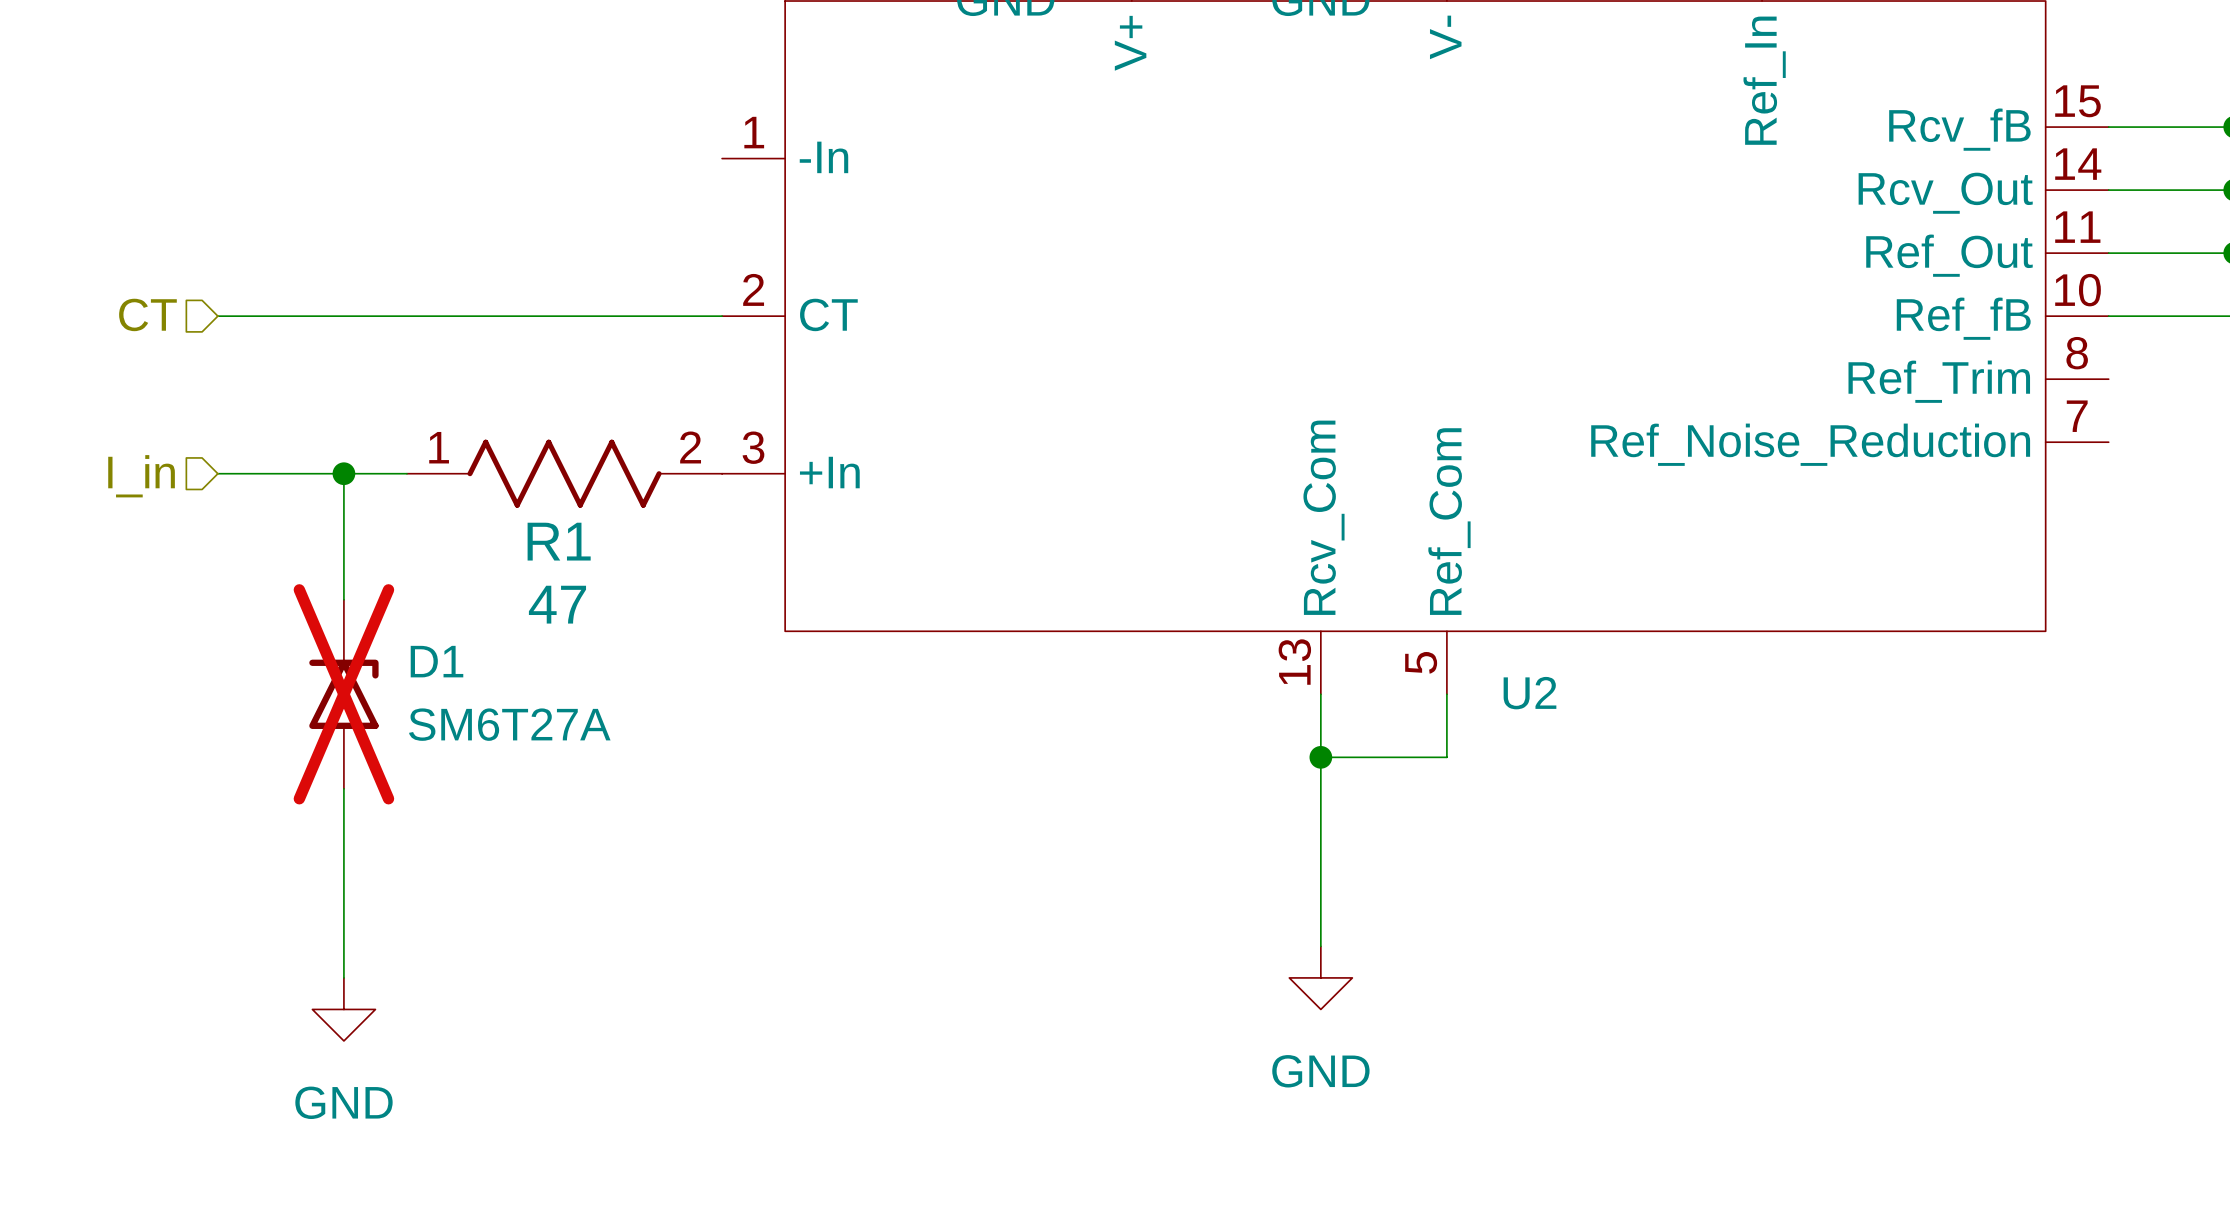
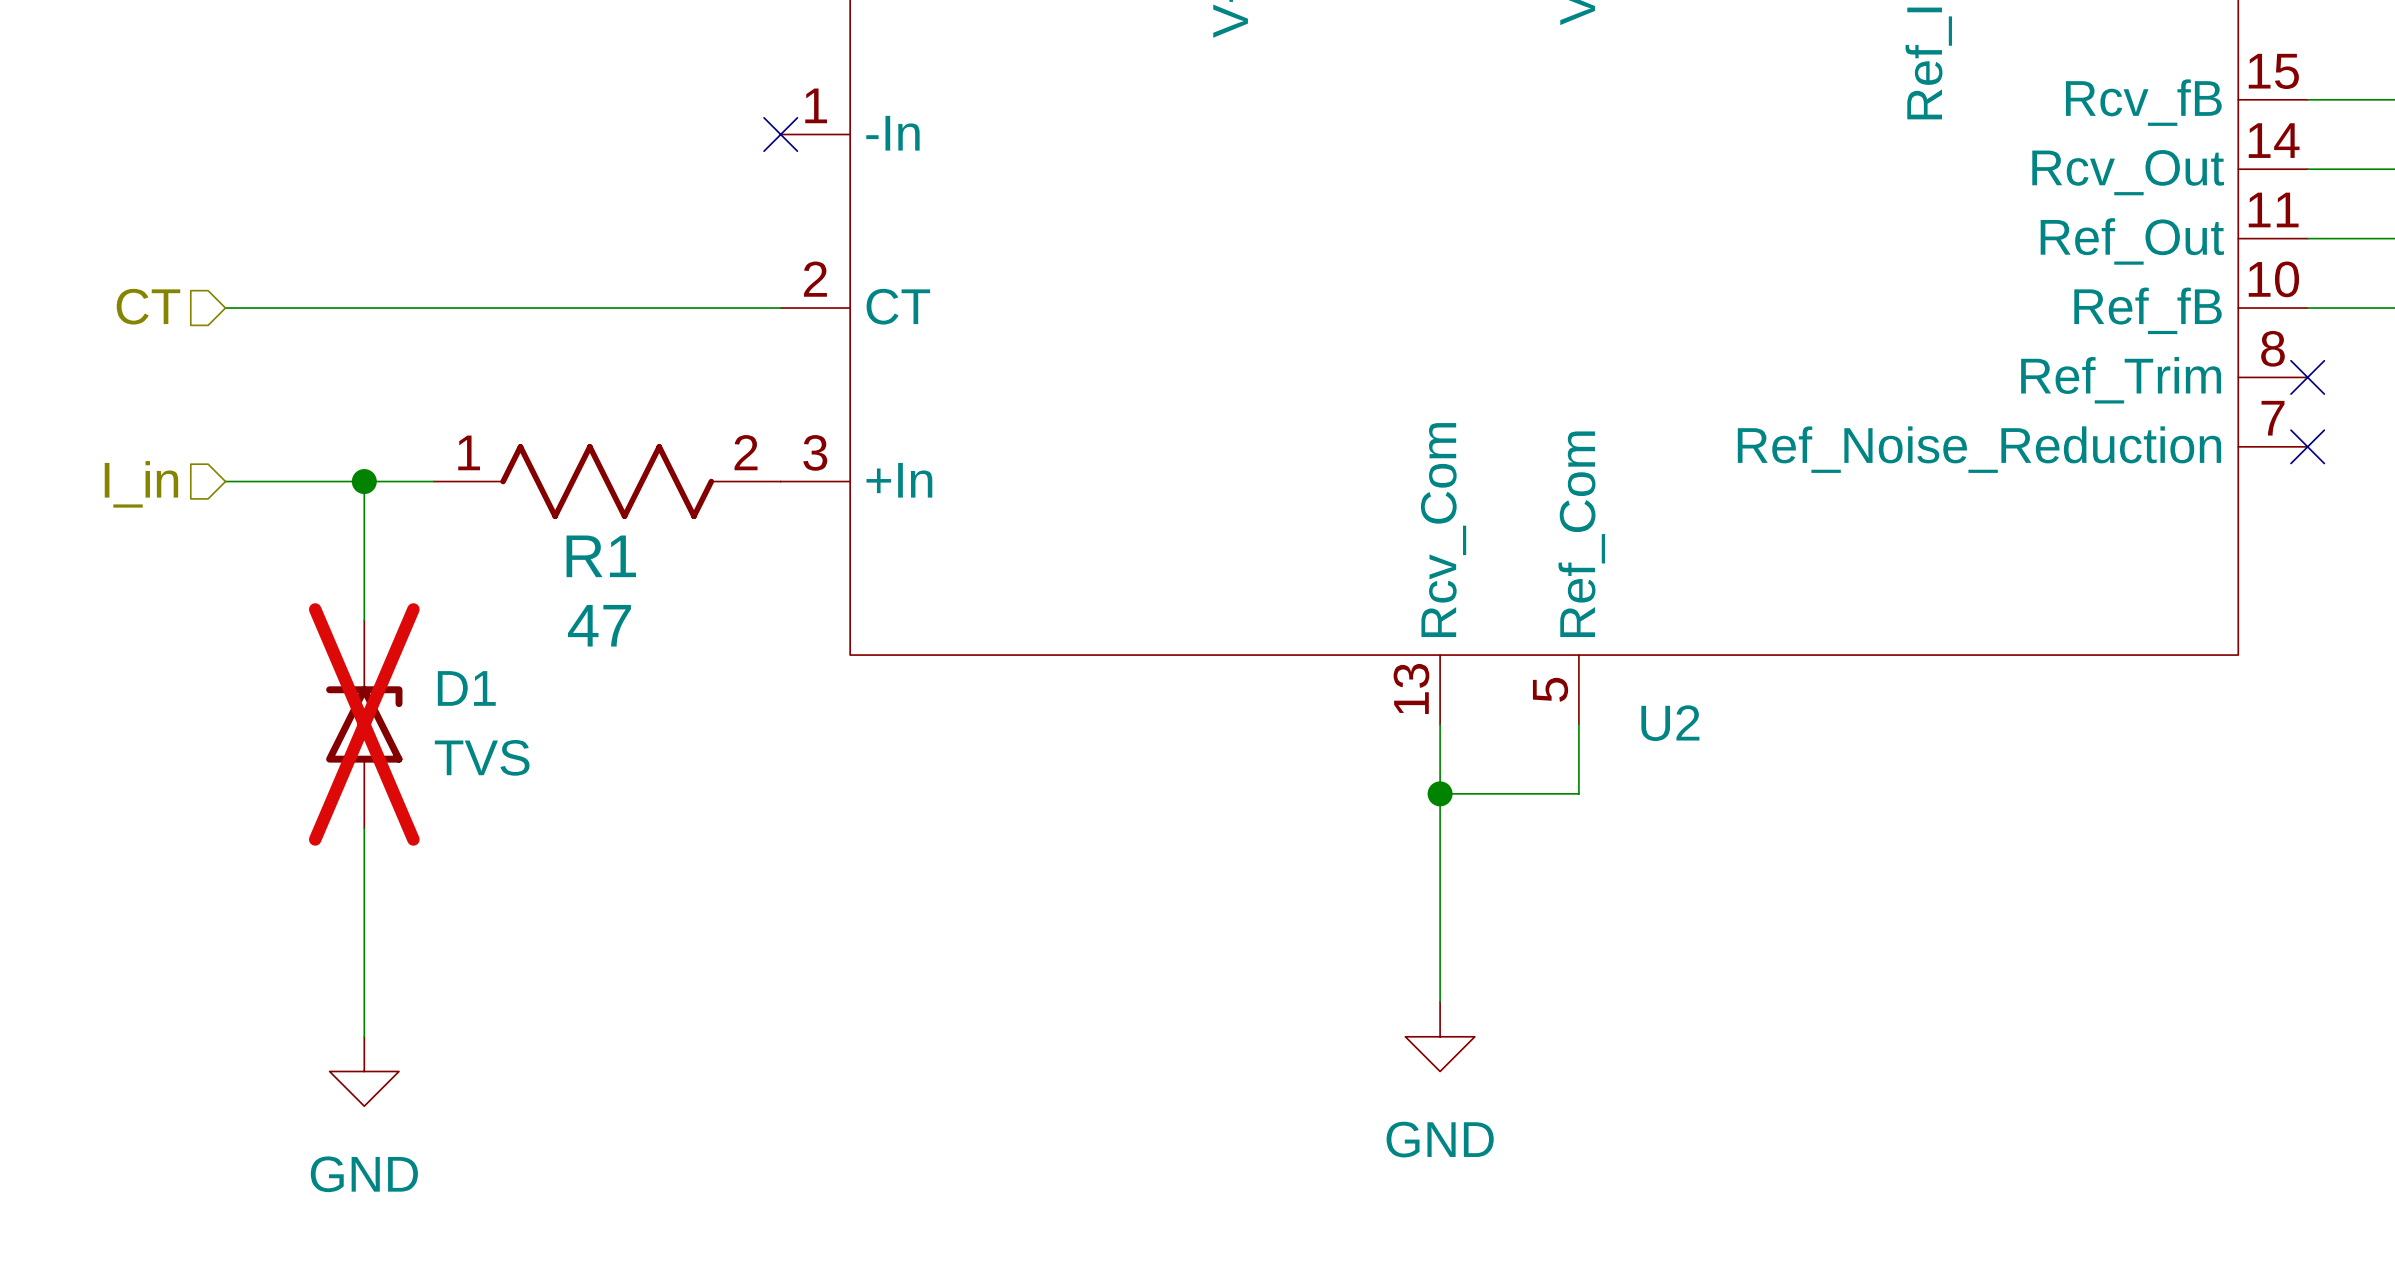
no-connect mark: none -> (780, 134)
no-connect mark: none -> (2307, 377)
no-connect mark: none -> (2307, 446)
D1 value: SM6T27A (509, 724) -> TVS (482, 757)

